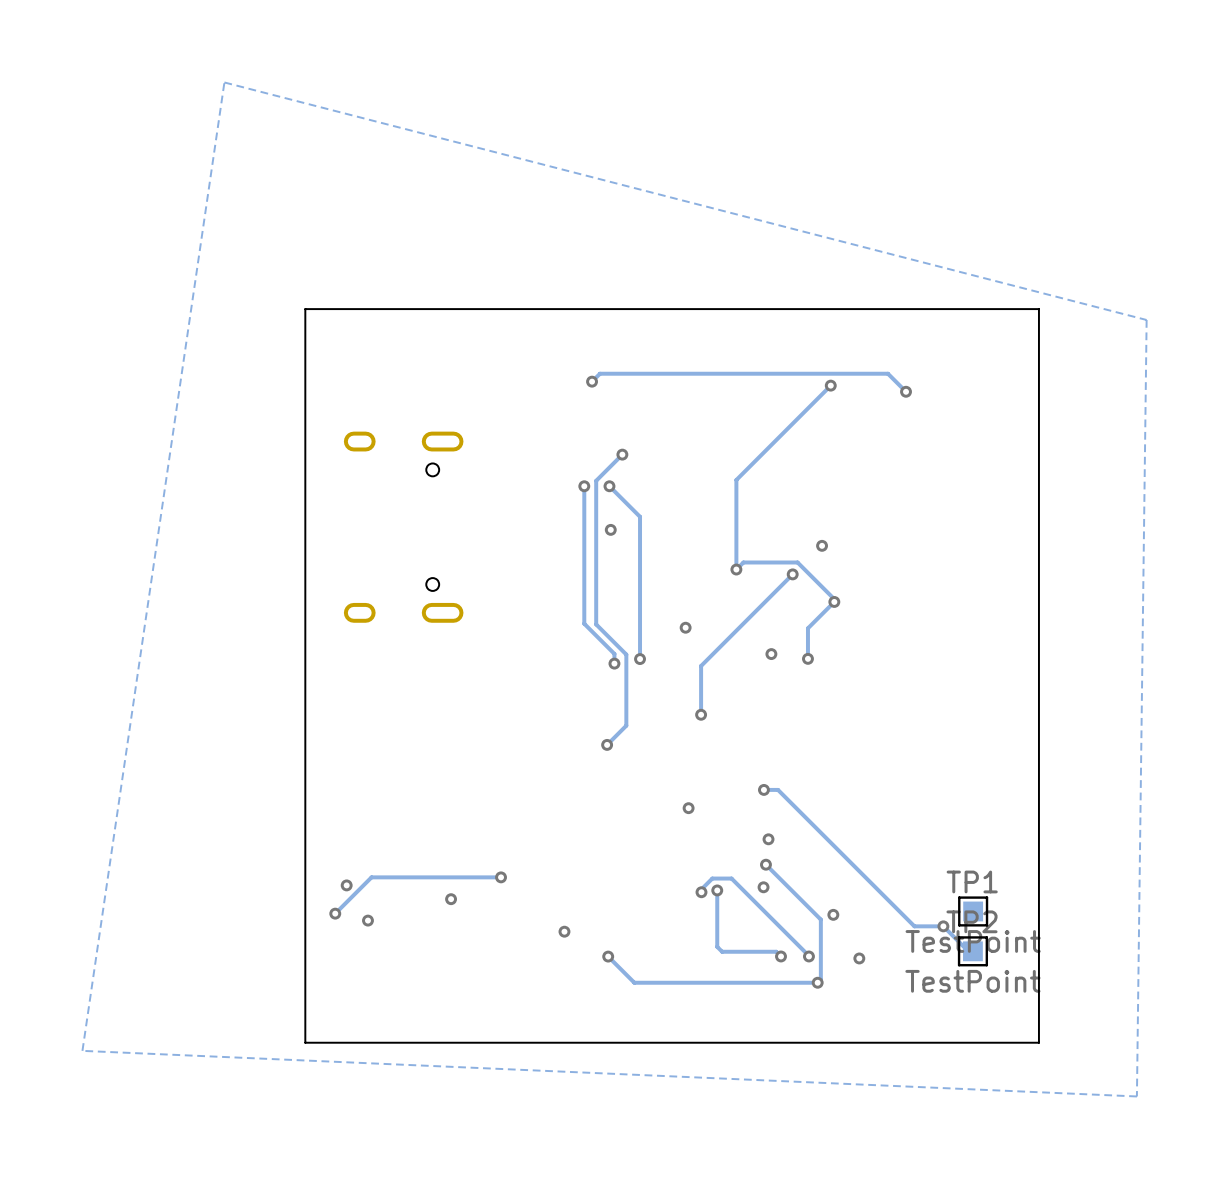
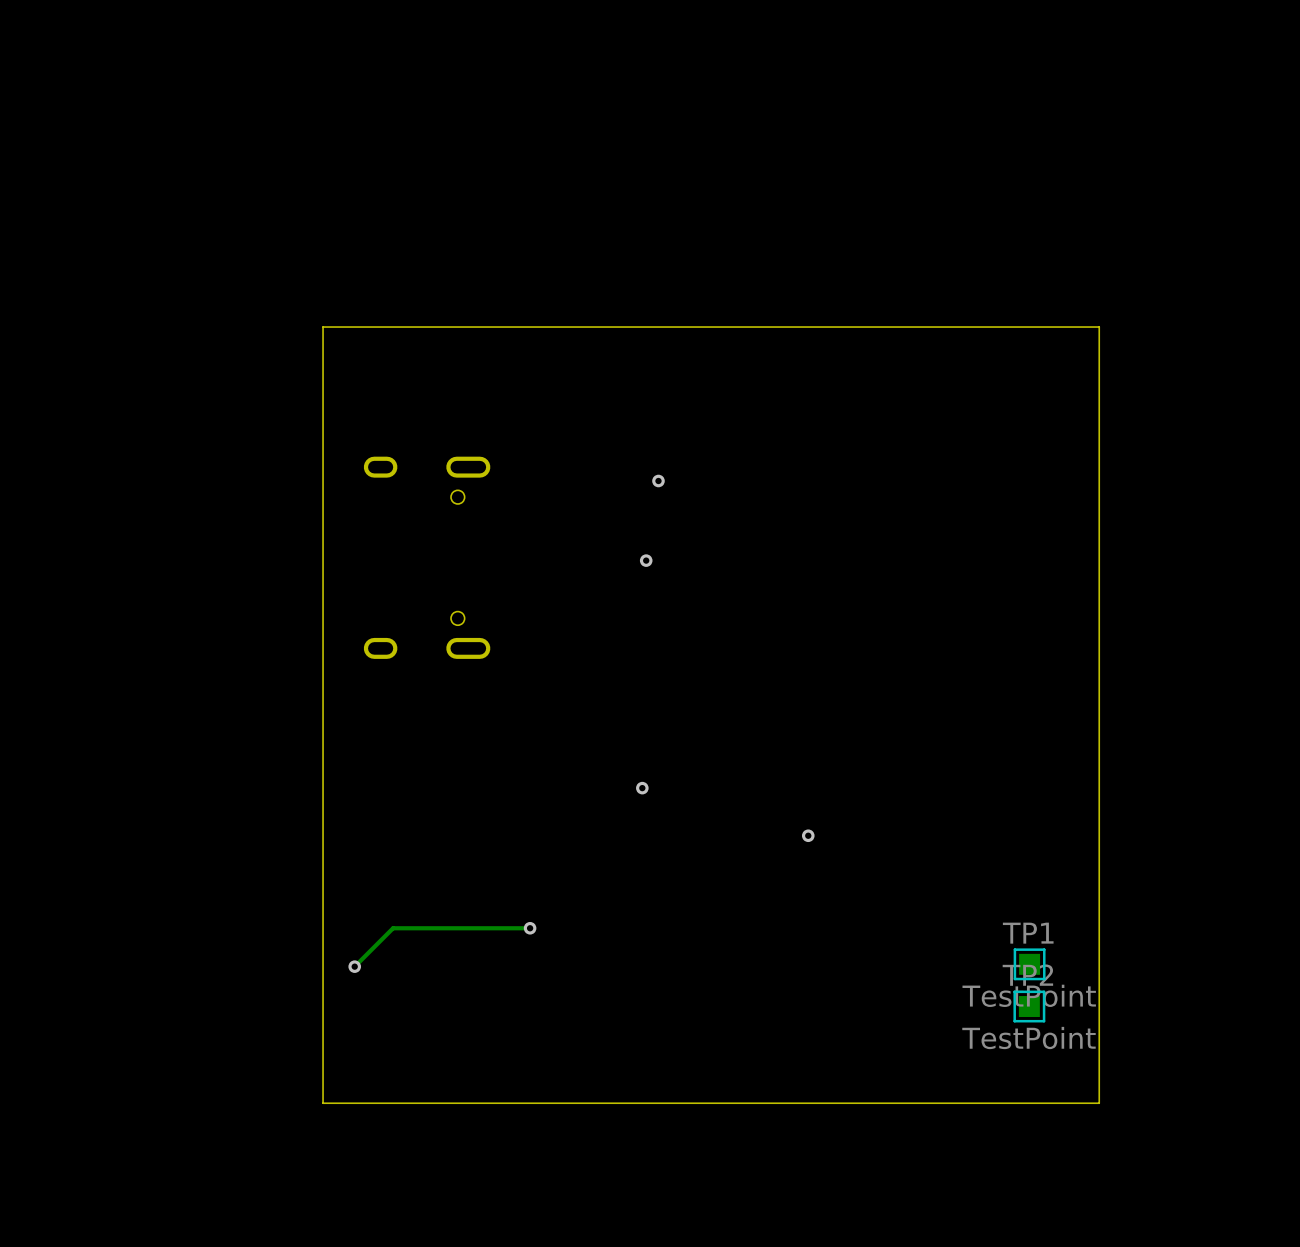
zone outline: (224, 82) (82, 1050) (1136, 1096) (1146, 319) (224, 82) -> none
track: (592, 381) (599, 373) (887, 373) (906, 391) -> none
via: (592, 381) -> none
track: (830, 385) (736, 480) (736, 569) (743, 562) (797, 562) (834, 599) (834, 601) (807, 628) (807, 658) -> none
via: (830, 385) -> none
via: (906, 391) -> none
track: (622, 454) (596, 480) (596, 624) (626, 654) (626, 725) (607, 744) -> none
track: (584, 486) (584, 623) (614, 653) (614, 663) -> none
via: (584, 486) -> none
track: (609, 486) (640, 516) (640, 659) -> none
via: (609, 486) -> none
via: (822, 545) -> none
via: (736, 569) -> none
track: (792, 574) (701, 666) (701, 714) -> none
via: (792, 574) -> none
via: (834, 601) -> none
via: (685, 627) -> none
via: (771, 654) -> none
via: (807, 658) -> none
via: (640, 659) -> none
via: (614, 663) -> none
via: (701, 714) -> none
track: (763, 789) (778, 789) (914, 926) (943, 926) (969, 952) (972, 951) -> none
via: (688, 808) -> none
via: (768, 839) -> none
track: (765, 864) (820, 919) (820, 979) (817, 982) (634, 982) (608, 956) -> none
via: (765, 864) -> none
via: (346, 885) -> none
via: (763, 887) -> none
track: (717, 890) (717, 946) (722, 951) (776, 951) (781, 956) -> none
via: (717, 890) -> none
track: (701, 892) (701, 889) (712, 878) (731, 878) (808, 956) -> none
via: (701, 892) -> none
via: (451, 899) -> none
via: (833, 914) -> none
via: (367, 920) -> none
via: (943, 926) -> none
via: (564, 931) -> none
via: (608, 956) -> none
via: (781, 956) -> none
via: (808, 956) -> none
via: (859, 958) -> none
via: (817, 982) -> none

